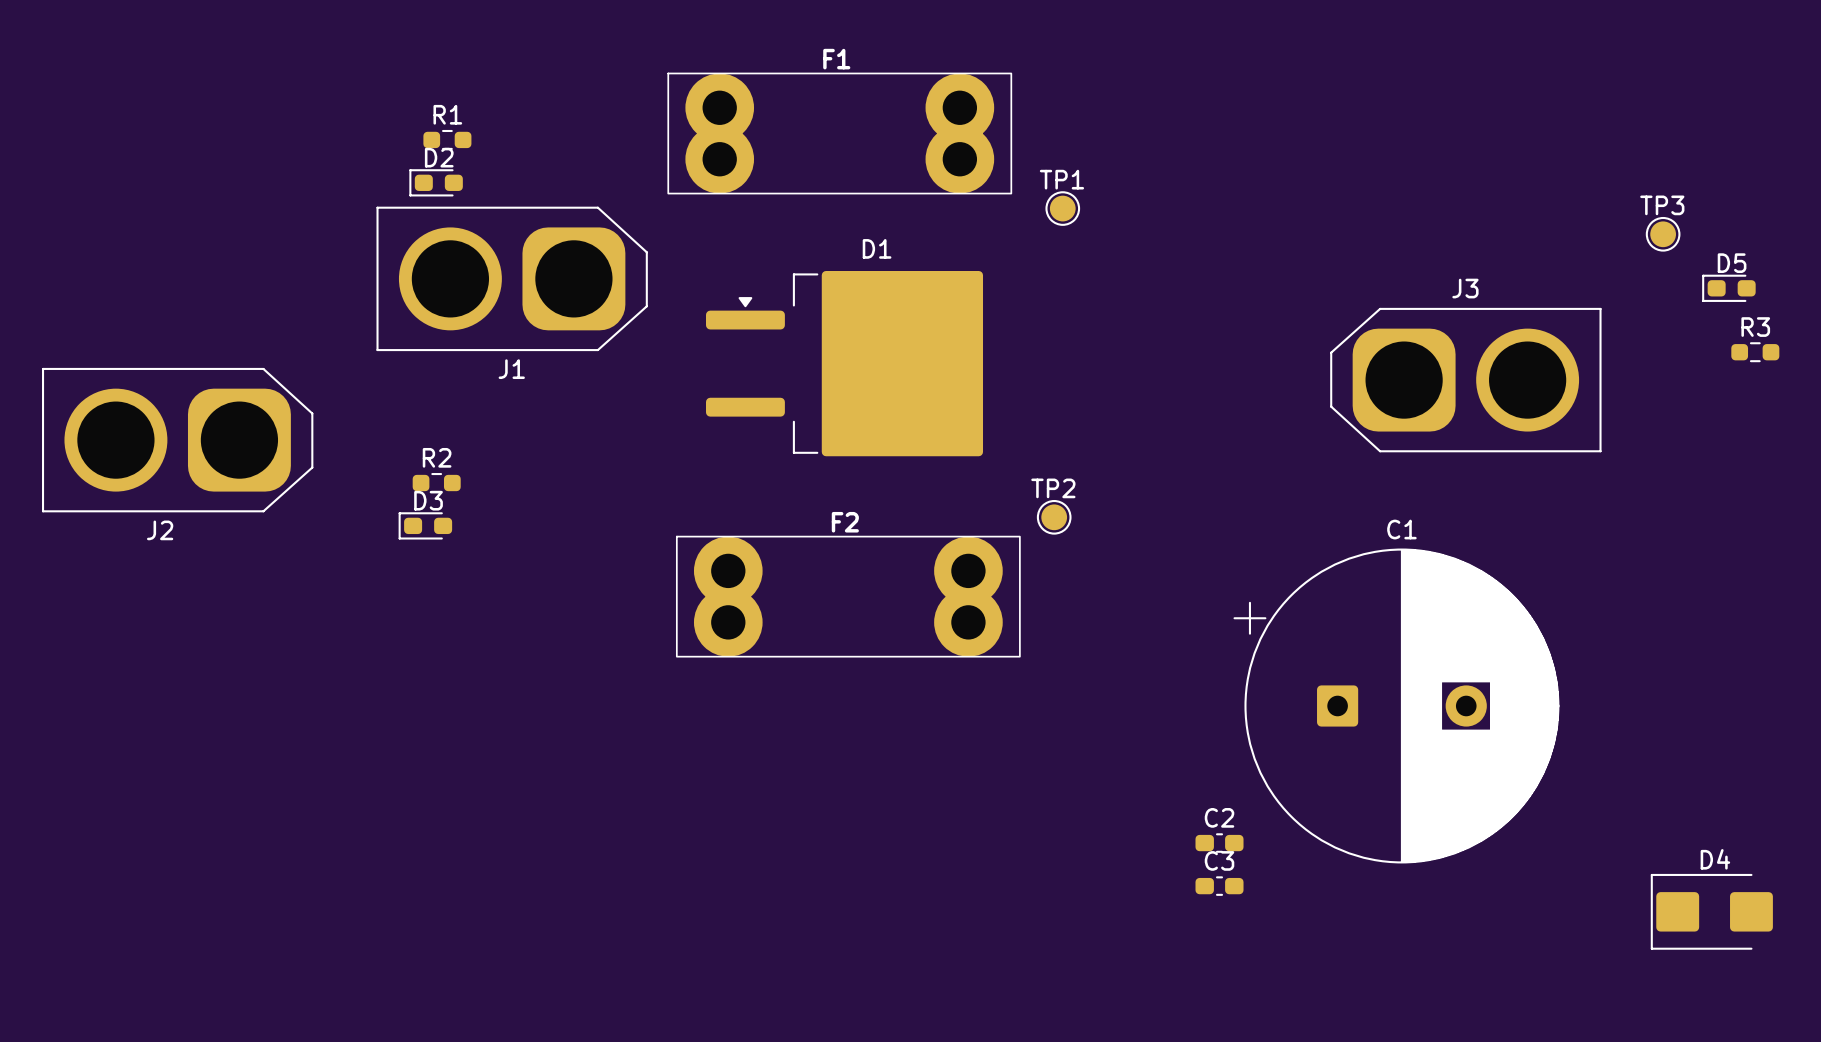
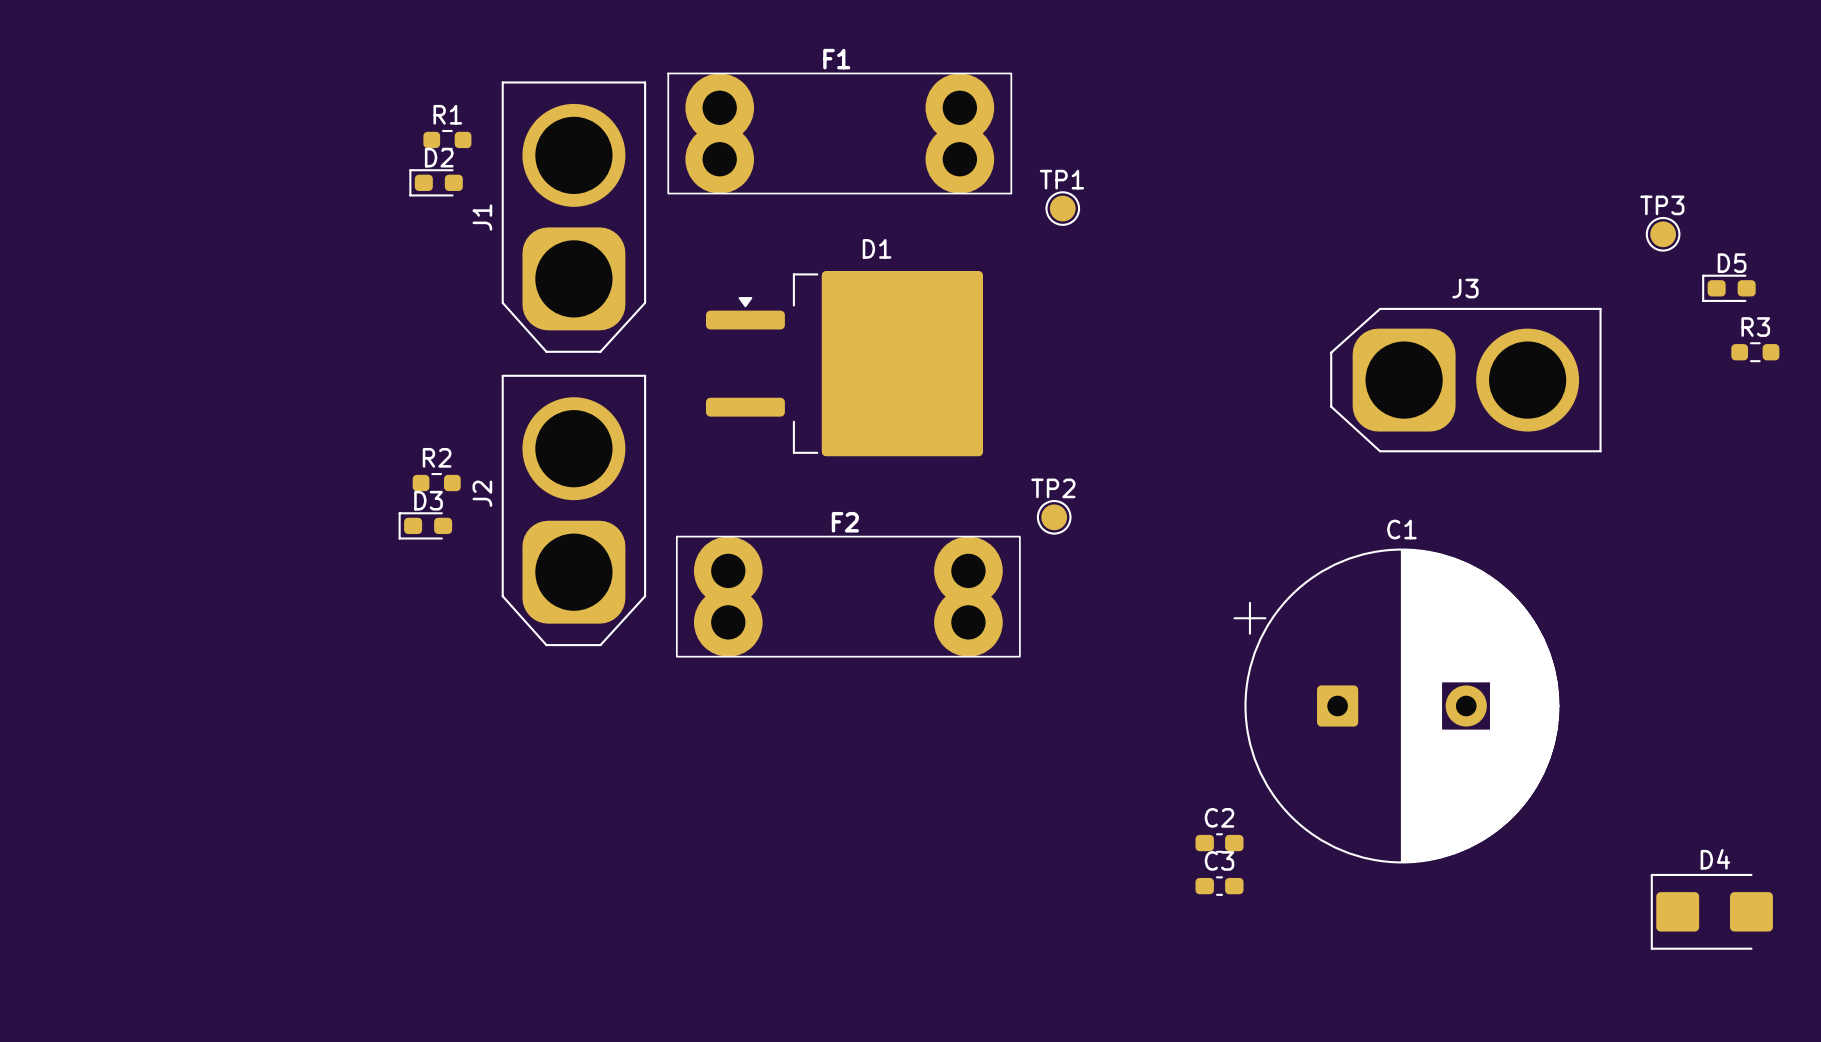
J1 rotation: 0° (512, 278) -> 90° clockwise (573, 217)
J2 rotation: 0° (177, 440) -> 90° clockwise (573, 510)
J2 position: (177, 440) -> (573, 510)

